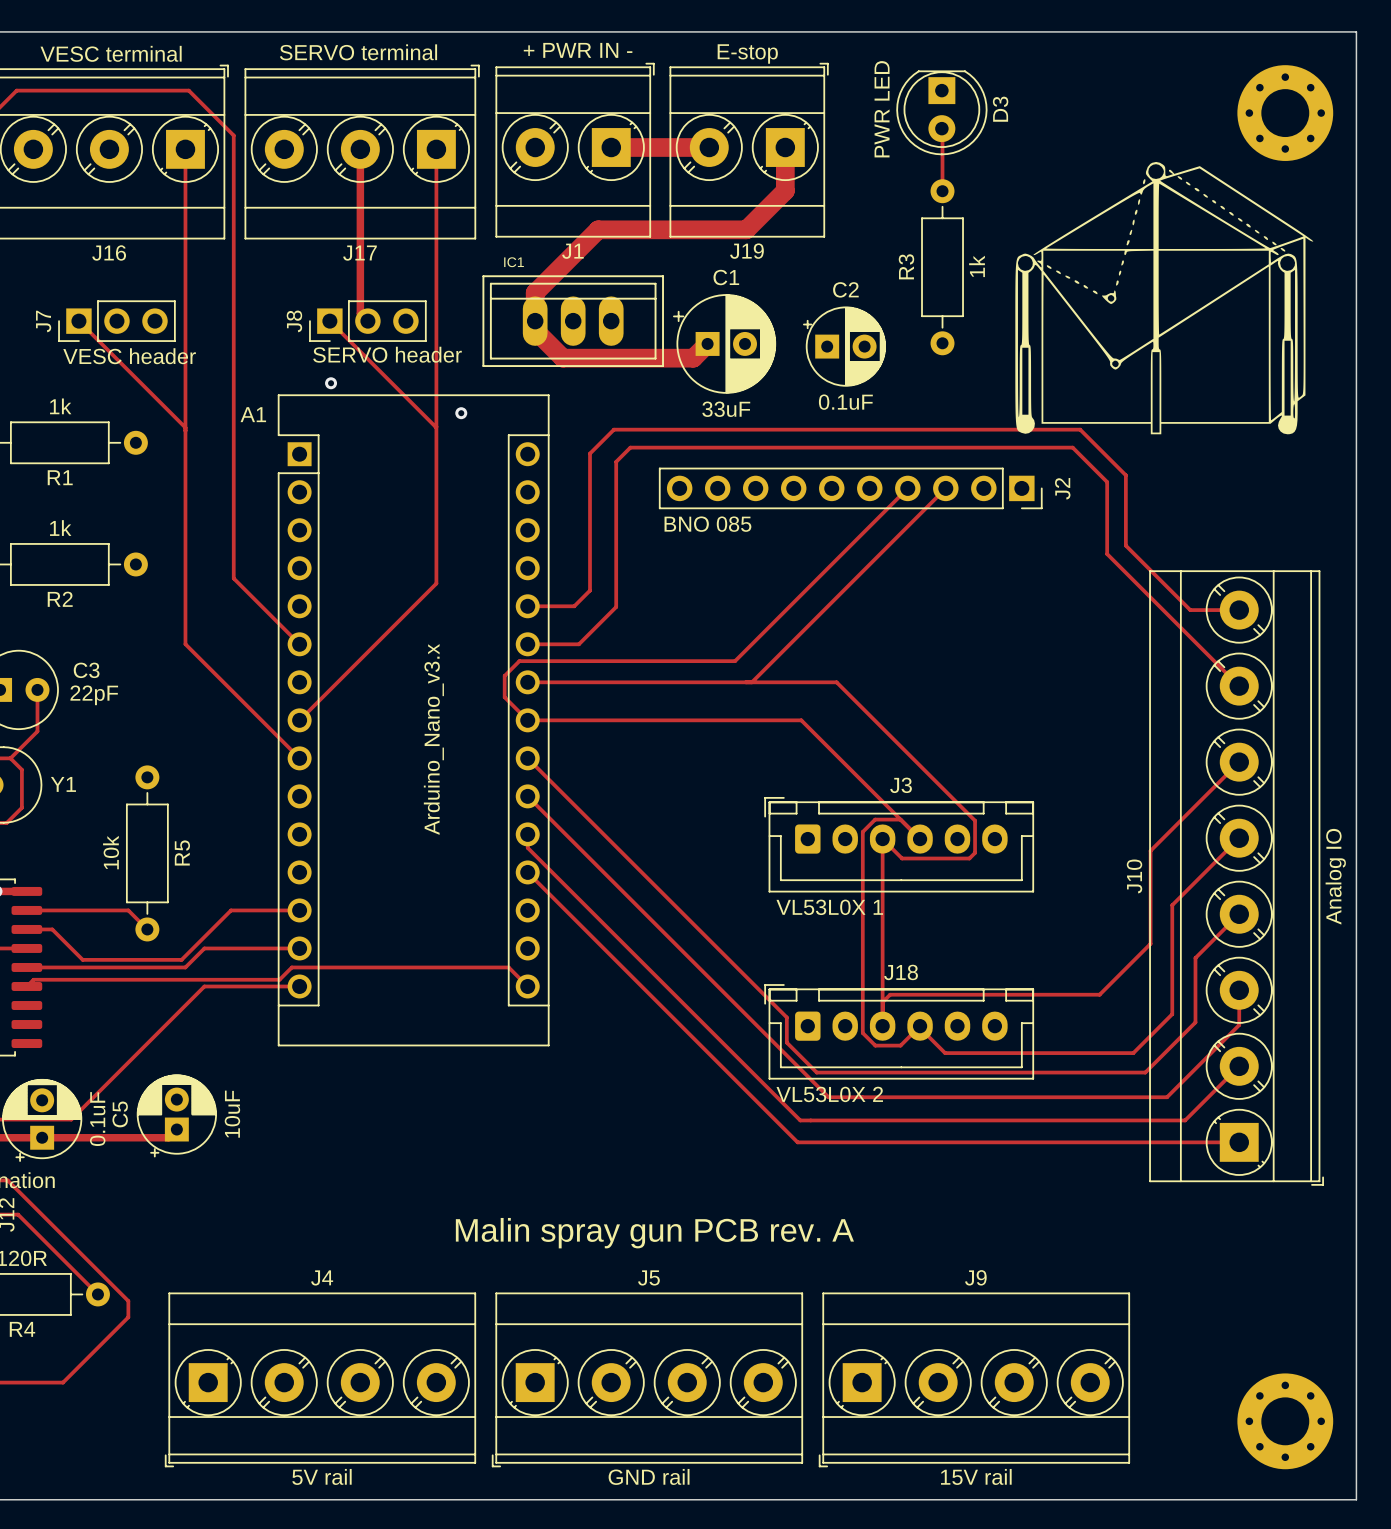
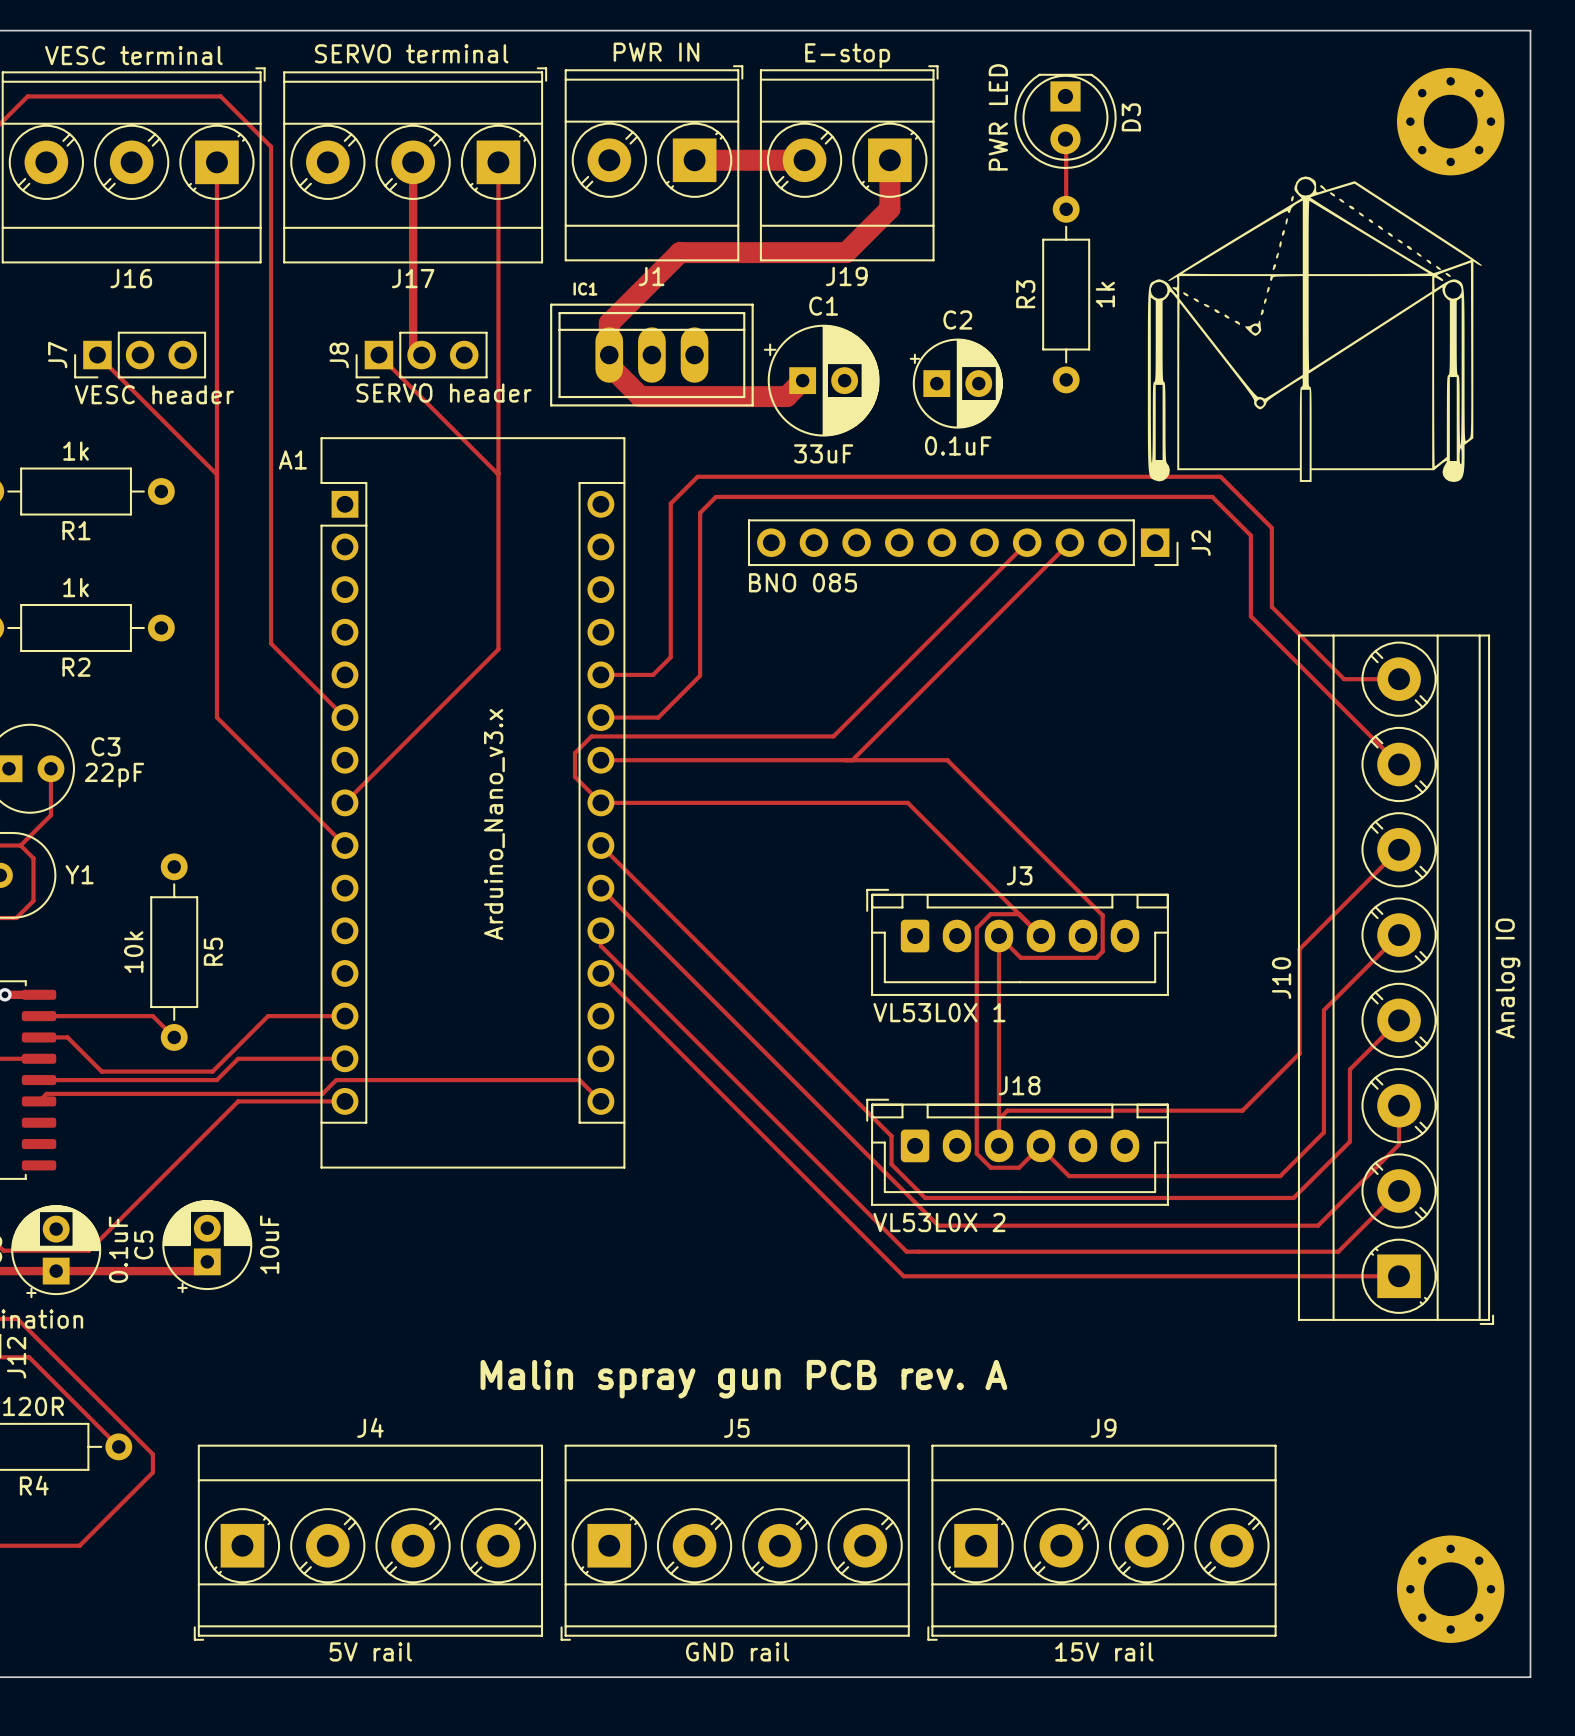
text: + PWR IN - (578, 50) -> none
J1 value: none -> PWR IN (656, 52)
via: (331, 383) -> none
via: (461, 413) -> none

